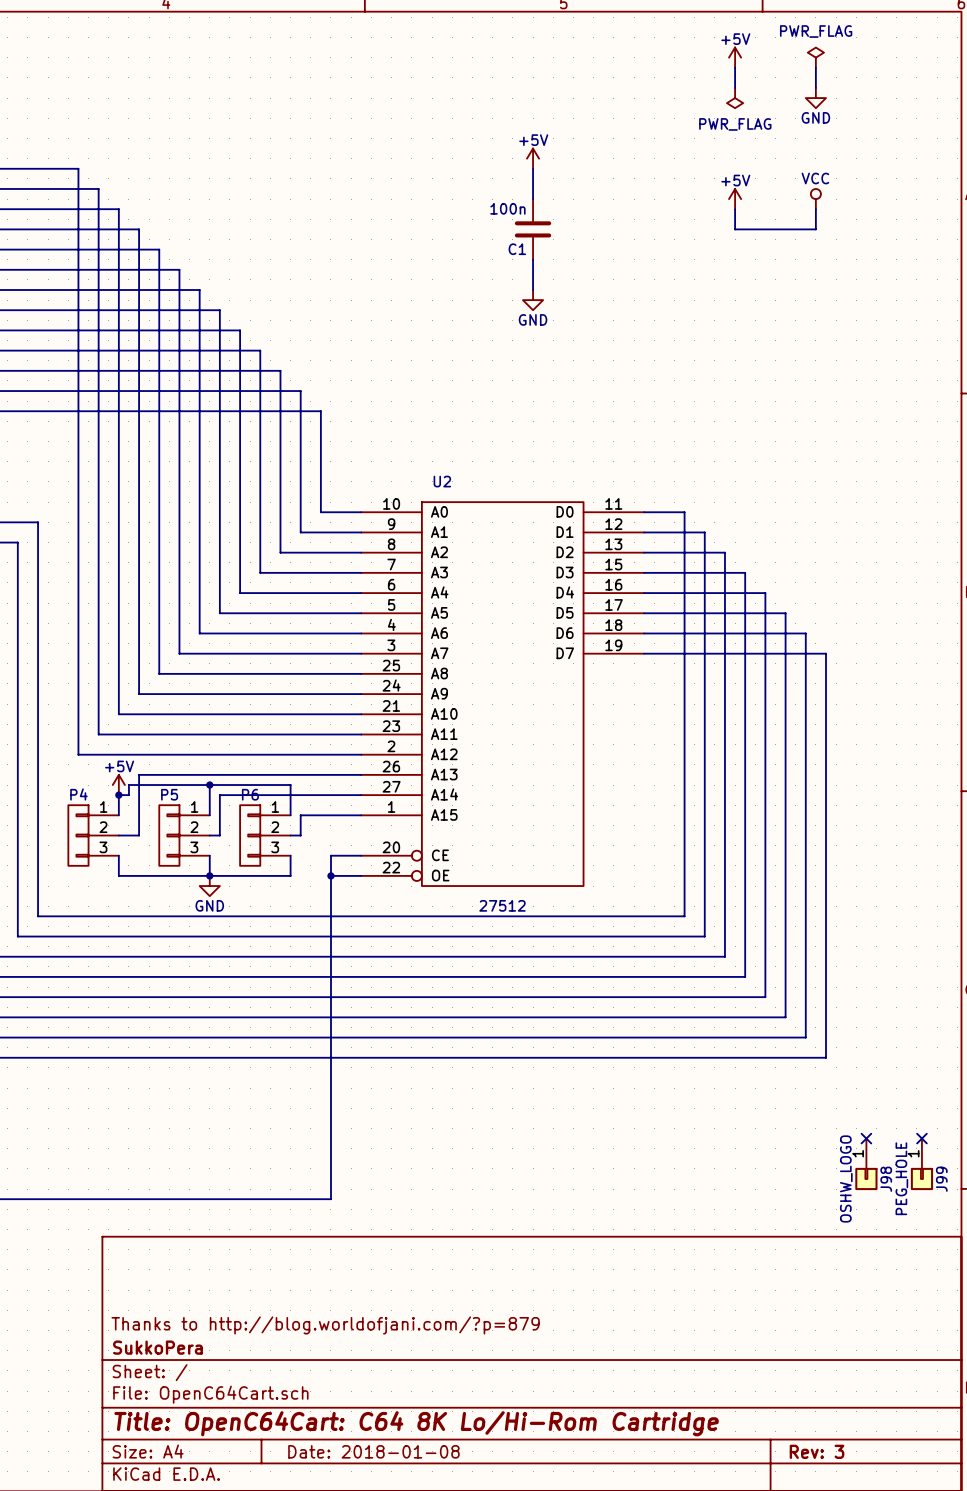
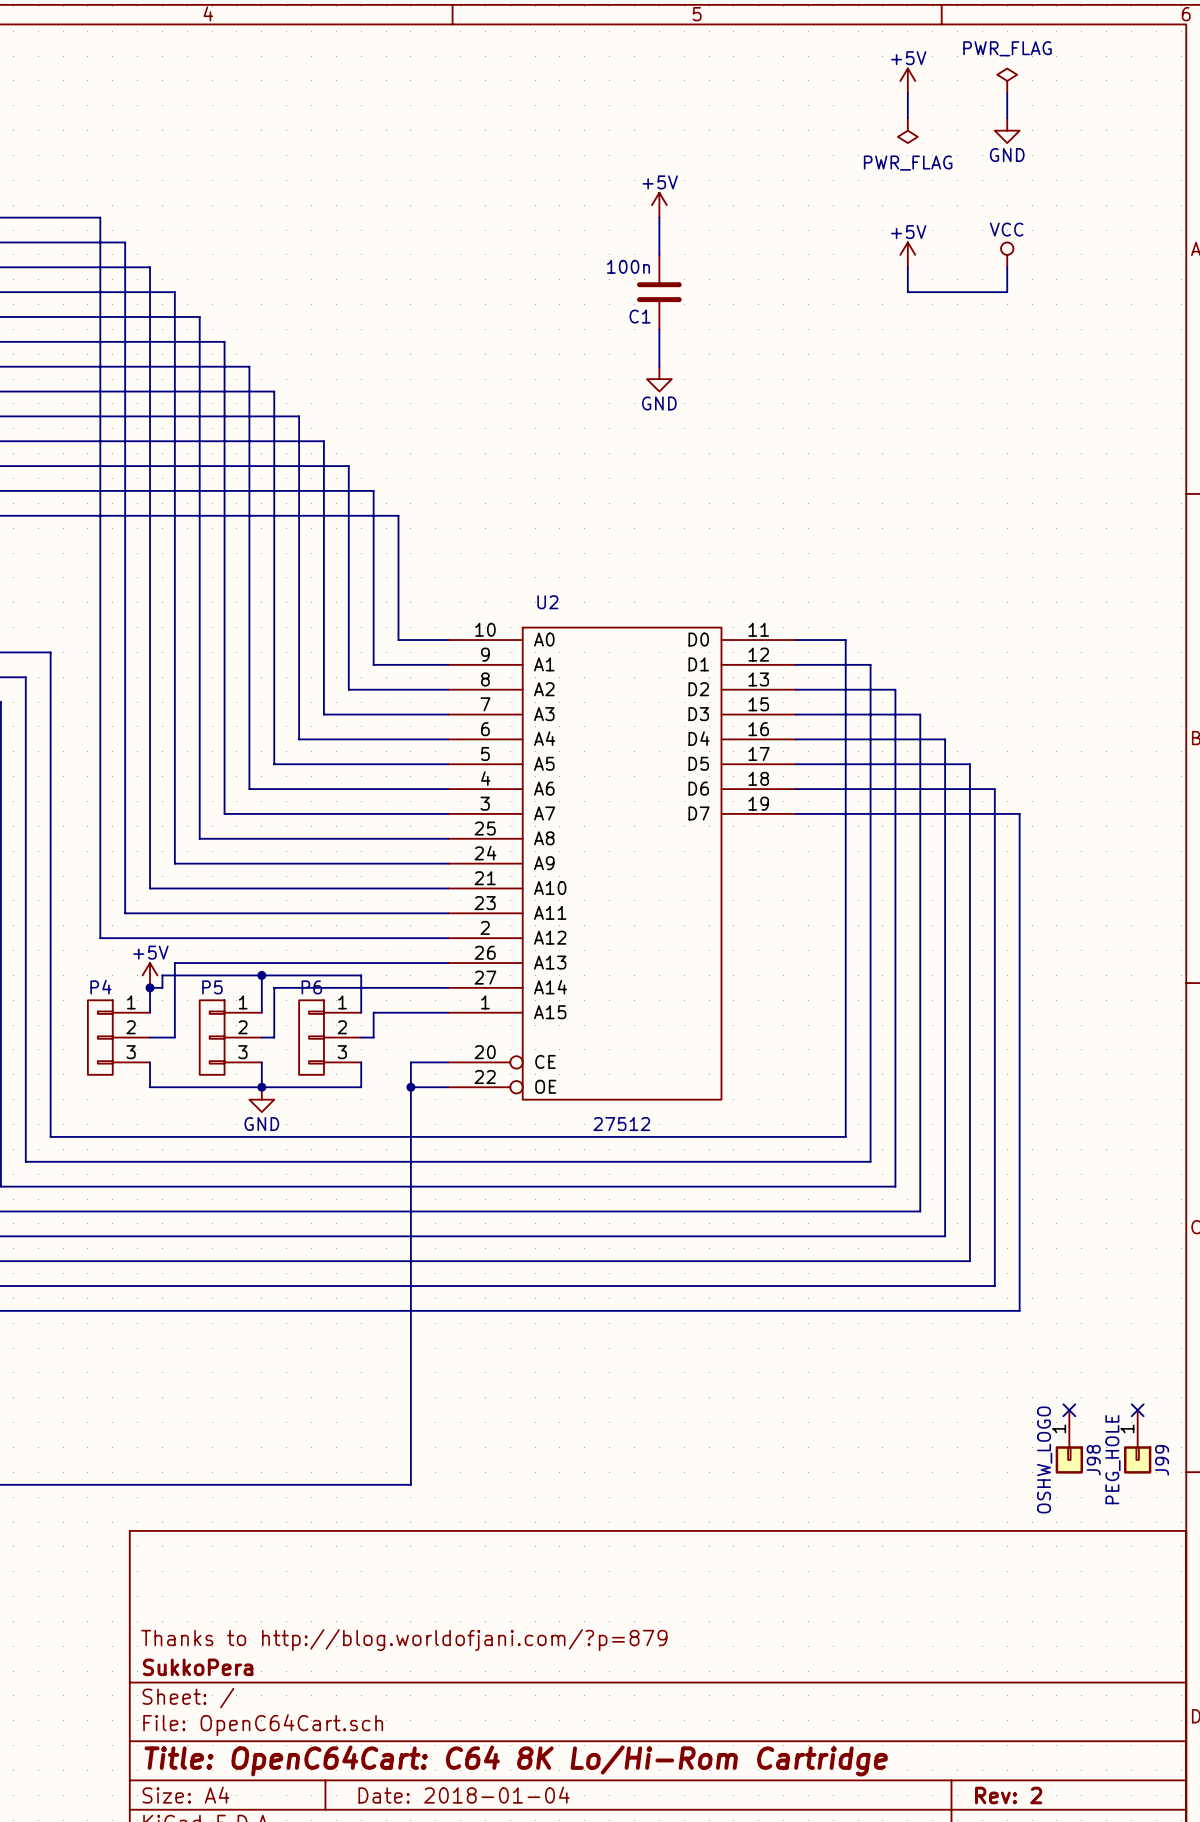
title block: Date: 2018-01-08 (373, 1451) -> Date: 2018-01-04 (464, 1795)
title block: Rev: 3 (817, 1451) -> Rev: 2 (1008, 1795)

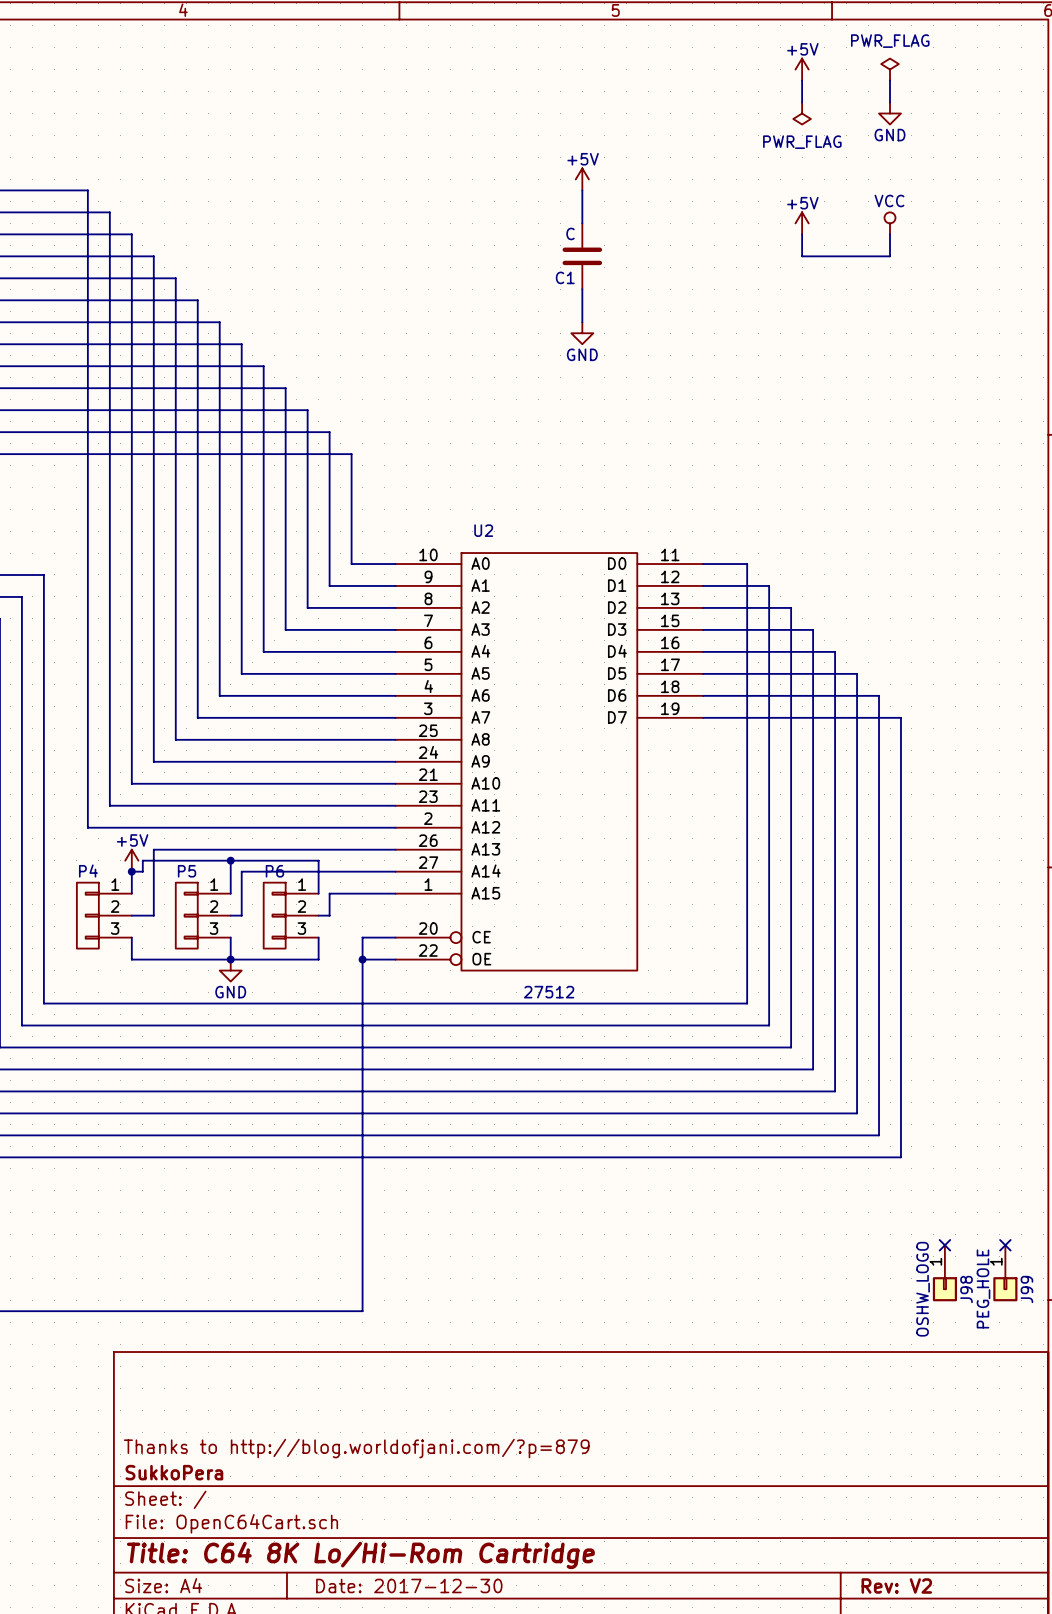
C1 value: 100n (628, 266) -> C (570, 233)
title block: Title: OpenC64Cart: C64 8K Lo/Hi-Rom Cartridge (516, 1760) -> Title: C64 8K Lo/Hi-Rom Cartridge (360, 1555)
title block: Date: 2018-01-04 (464, 1795) -> Date: 2017-12-30 (409, 1585)
title block: Rev: 2 (1008, 1795) -> Rev: V2 (896, 1585)

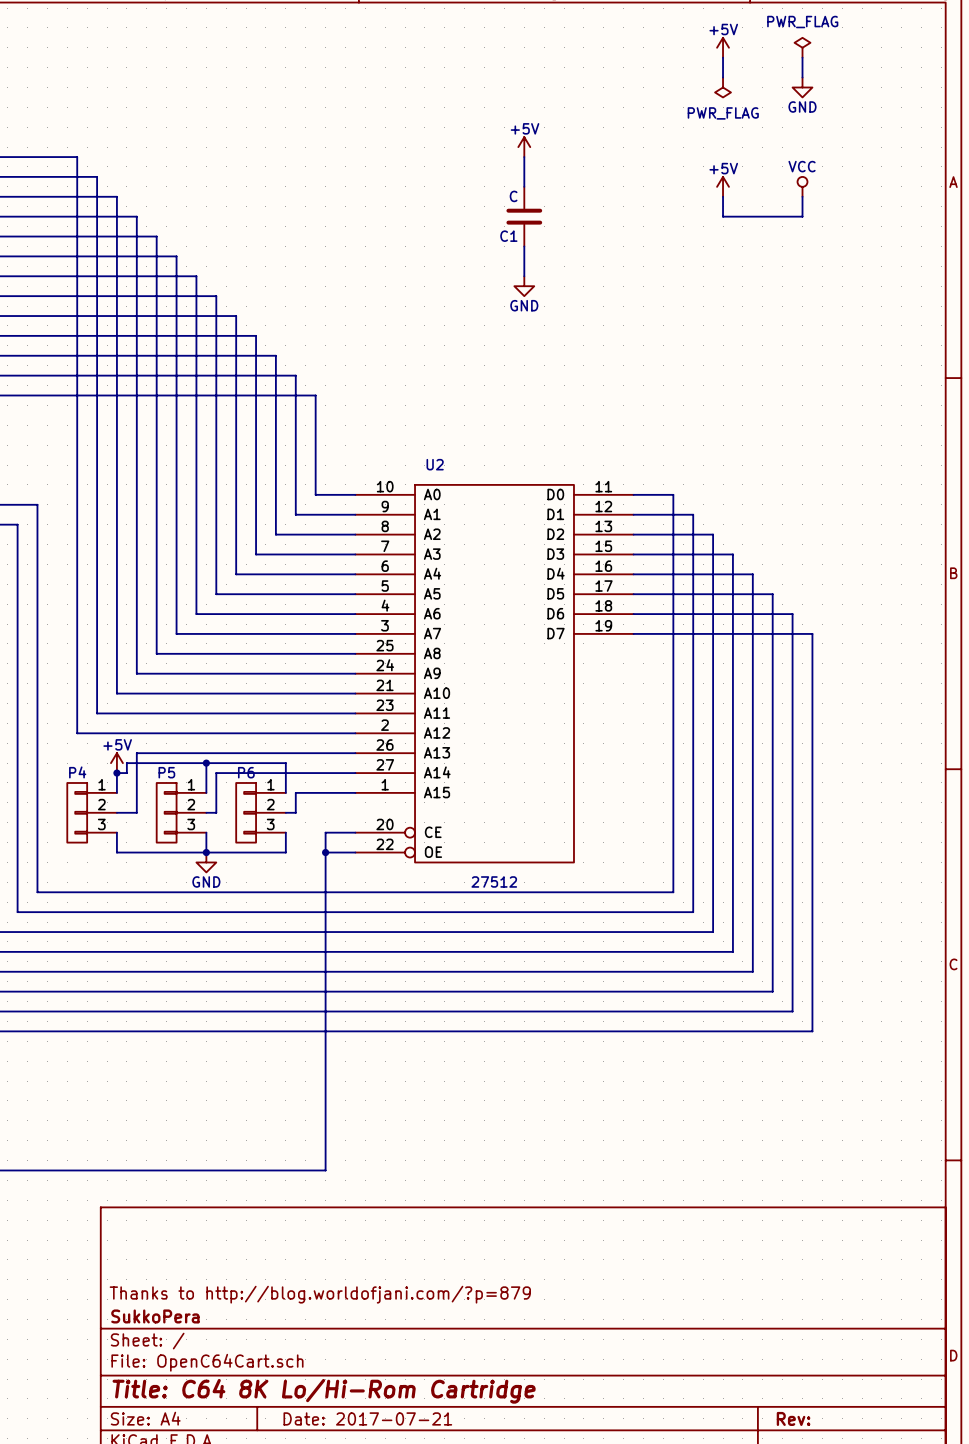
no-connect mark: (944, 1245) -> none
no-connect mark: (1005, 1245) -> none
J98: OSHW_LOGO (944, 1273) -> none
J99: PEG_HOLE (1005, 1273) -> none
title block: Date: 2017-12-30 (409, 1585) -> Date: 2017-07-21 (367, 1418)
title block: Rev: V2 (896, 1585) -> Rev: (793, 1418)

